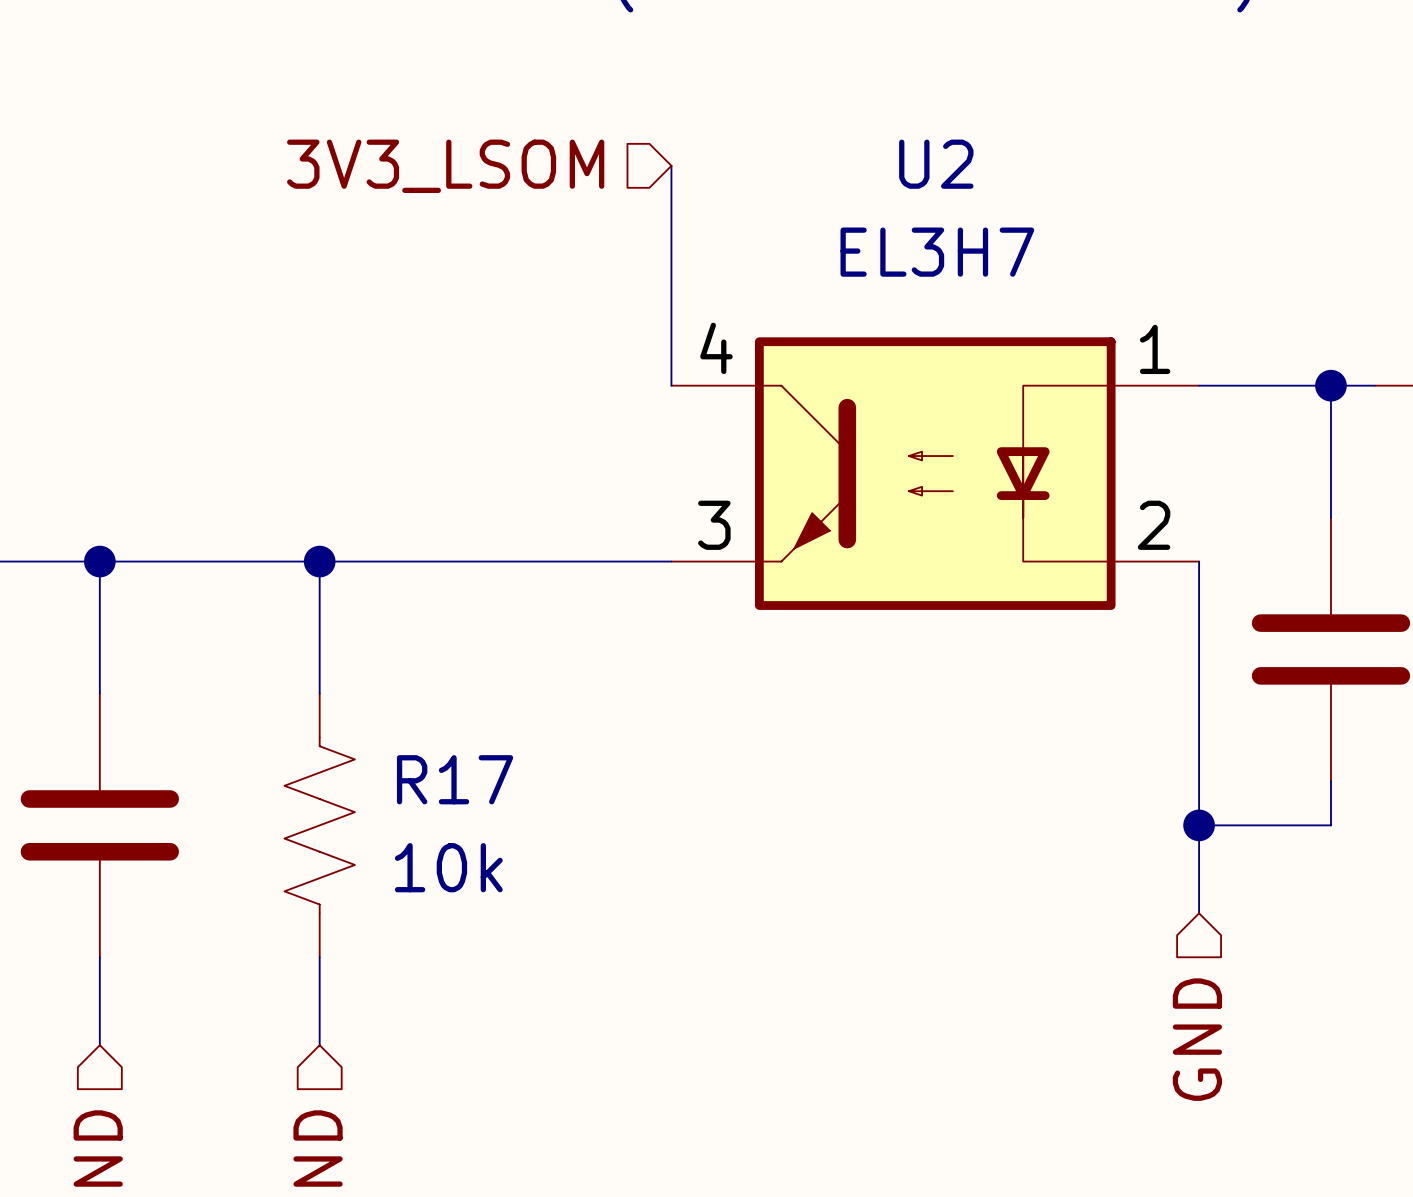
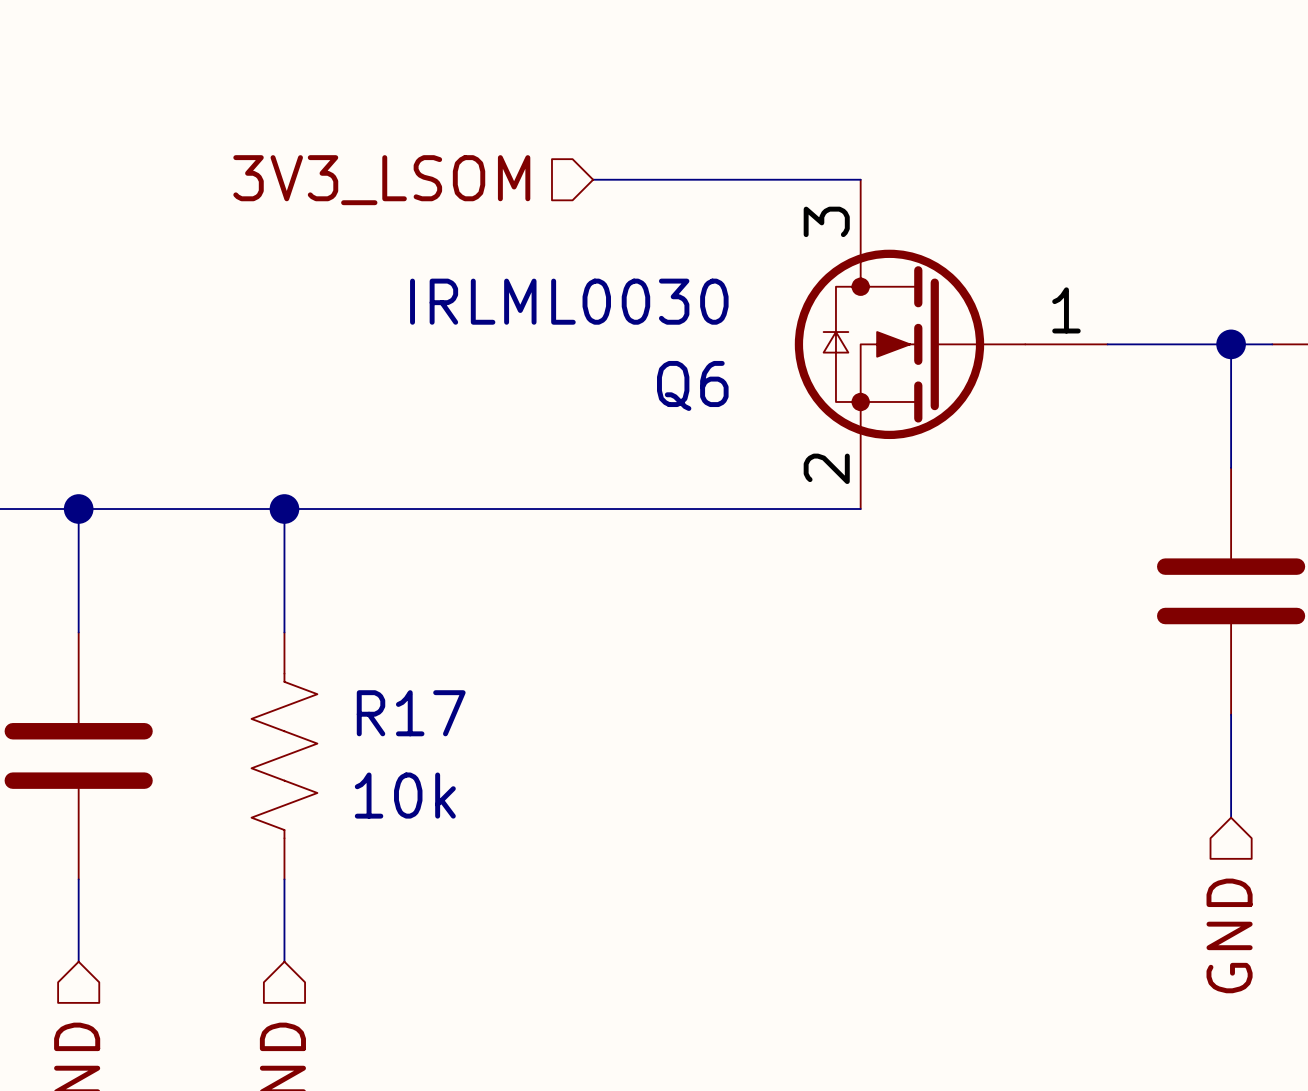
wire: (671, 165) (671, 385) -> none
hierarchical label position: 3V3_LSOM (445, 166) -> 3V3_LSOM (381, 180)
wire: none -> (593, 179) (860, 179)
Q6: none -> IRLML0030 (951, 344)
U2: EL3H7 (935, 473) -> none
wire: (1199, 561) (1199, 913) -> none
wire: (1199, 825) (1330, 825) -> (1231, 817) (1231, 755)
junction: (1199, 825) -> none
hierarchical label position: GND (1197, 1039) -> GND (1229, 935)

